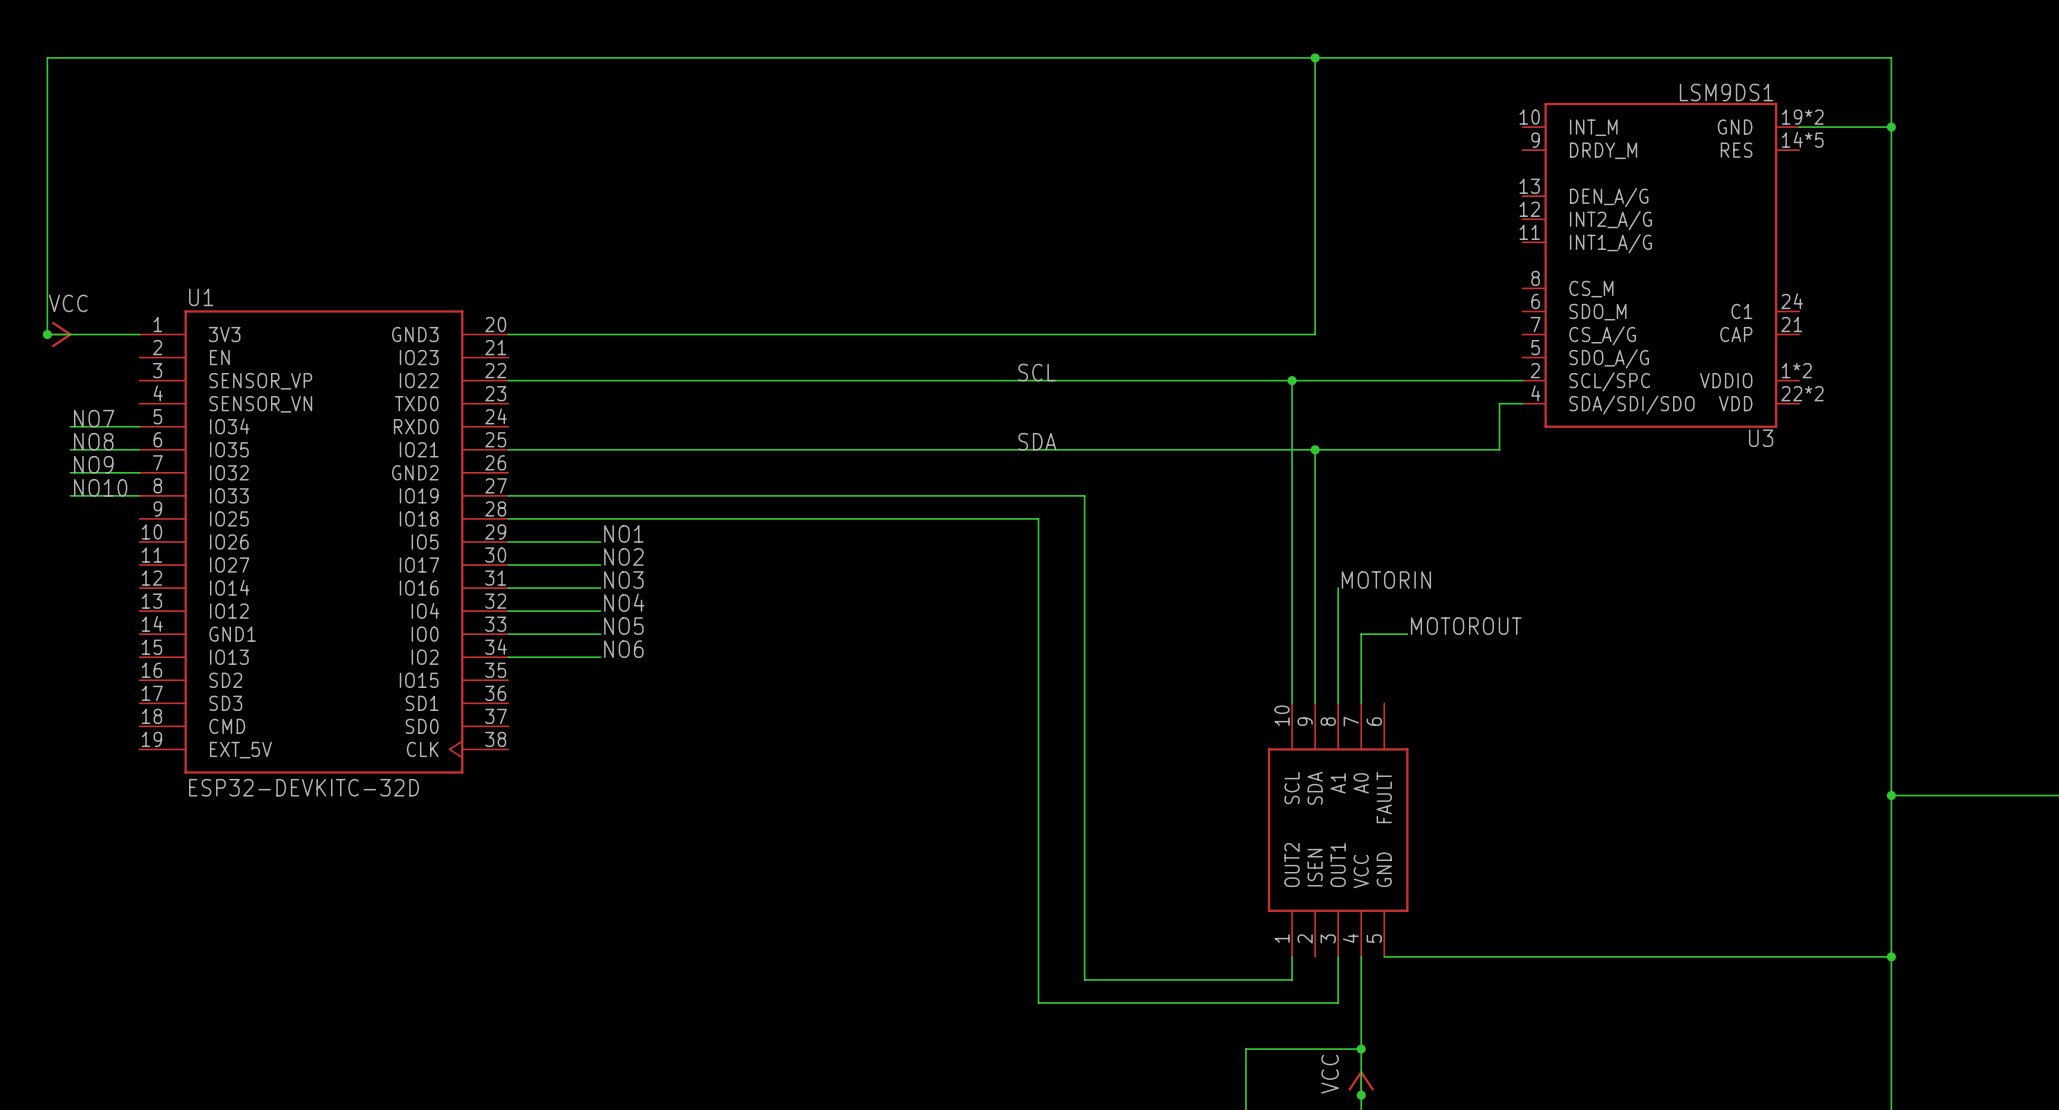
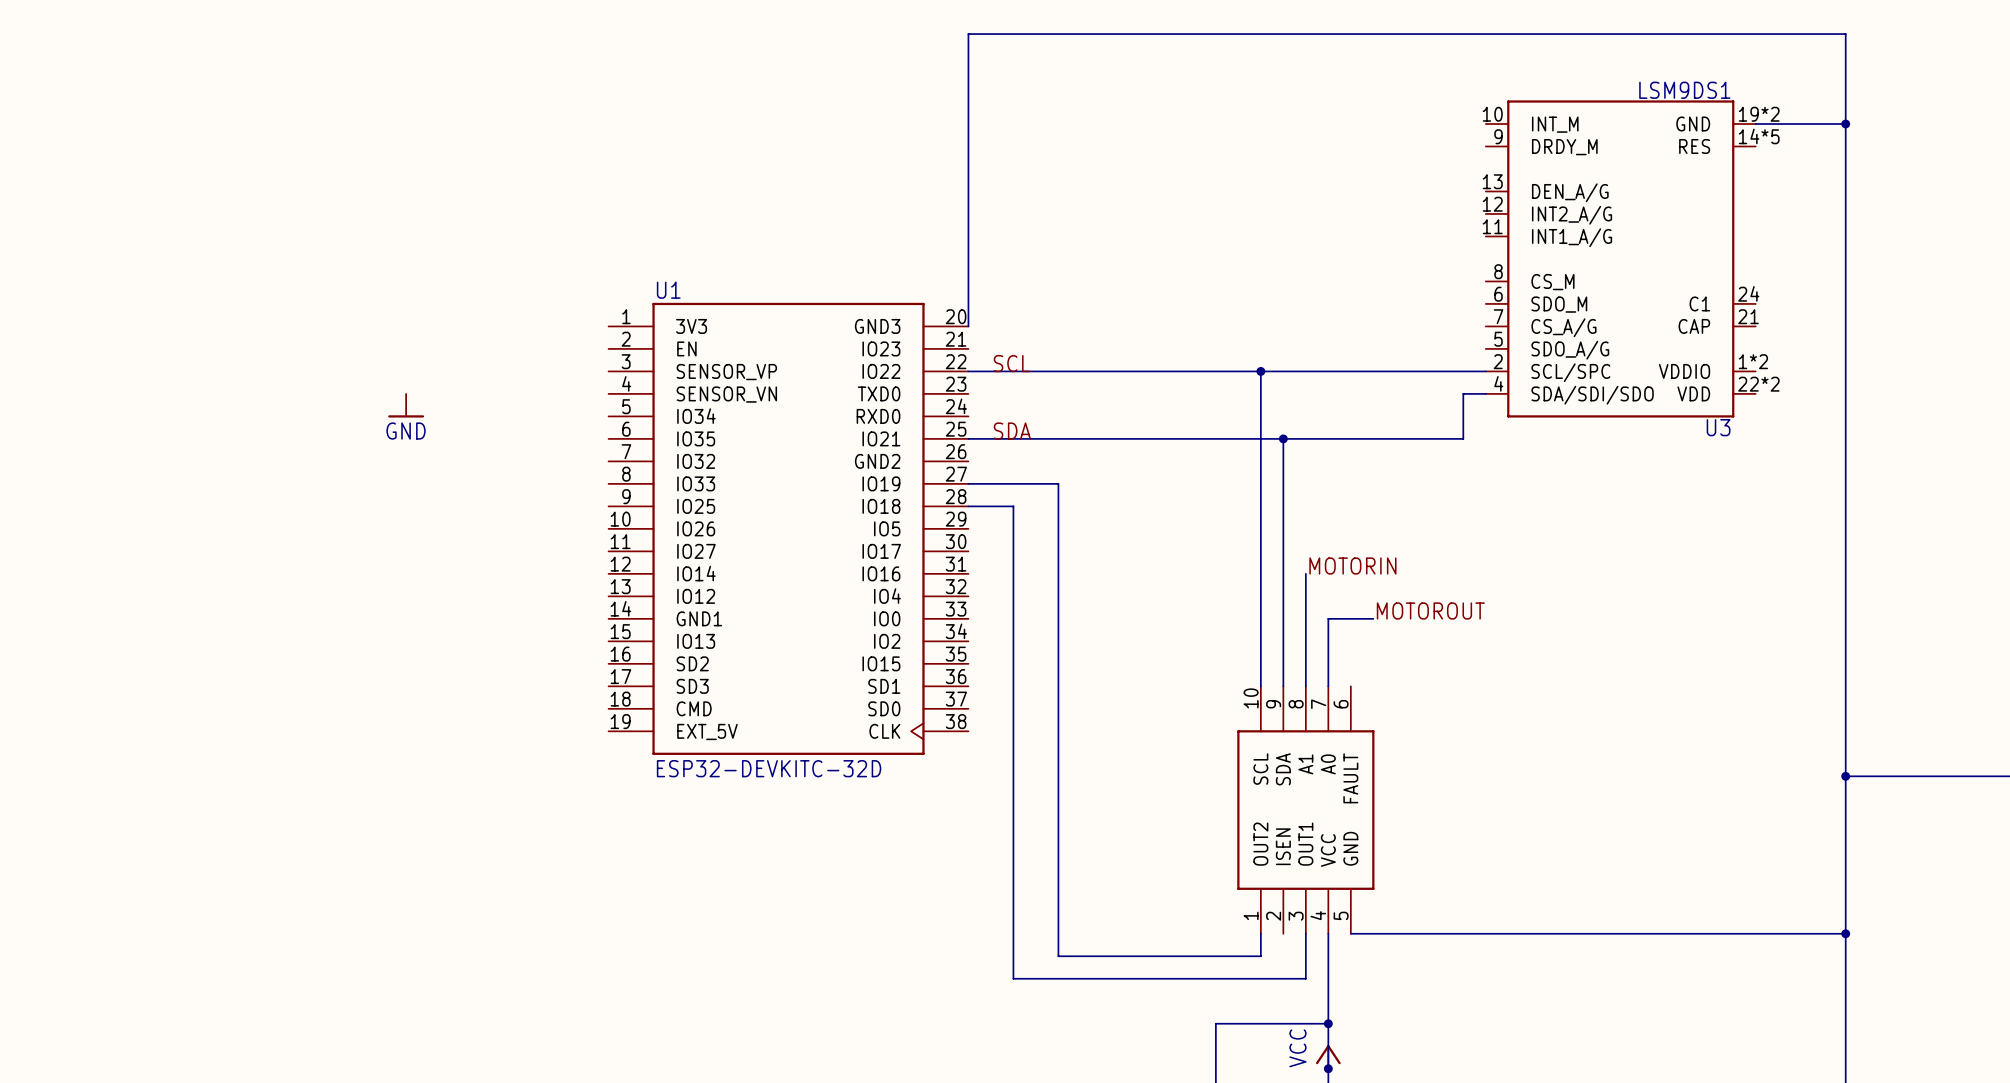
wire: (1315, 57) (1315, 334) (508, 334) -> none
junction: (1315, 57) -> none
wire: (1891, 57) (47, 57) (47, 334) (139, 334) -> (1845, 56) (1845, 34) (968, 34) (968, 326)
junction: (47, 334) -> none
power symbol: VCC (59, 334) -> none
wire: (508, 380) (992, 380) -> none
power symbol: none -> GND (406, 405)
label: NO7 (94, 418) -> none
wire: (70, 426) (139, 426) -> none
label: NO8 (93, 441) -> none
wire: (70, 449) (139, 449) -> none
wire: (508, 449) (992, 449) -> none
label: NO9 (93, 464) -> none
wire: (70, 472) (139, 472) -> none
label: NO10 (100, 487) -> none
wire: (70, 495) (139, 495) -> none
wire: (508, 495) (992, 495) -> none
wire: (508, 518) (992, 518) -> none
label: NO1 (623, 533) -> none
U1 position: (323, 541) -> (788, 528)
wire: (508, 541) (600, 541) -> none
label: NO2 (623, 556) -> none
wire: (508, 565) (600, 565) -> none
label: NO3 (623, 580) -> none
wire: (508, 588) (600, 588) -> none
label: NO4 (624, 602) -> none
wire: (508, 611) (600, 611) -> none
label: NO5 (623, 626) -> none
wire: (508, 634) (600, 634) -> none
label: NO6 (623, 649) -> none
wire: (508, 657) (600, 657) -> none

